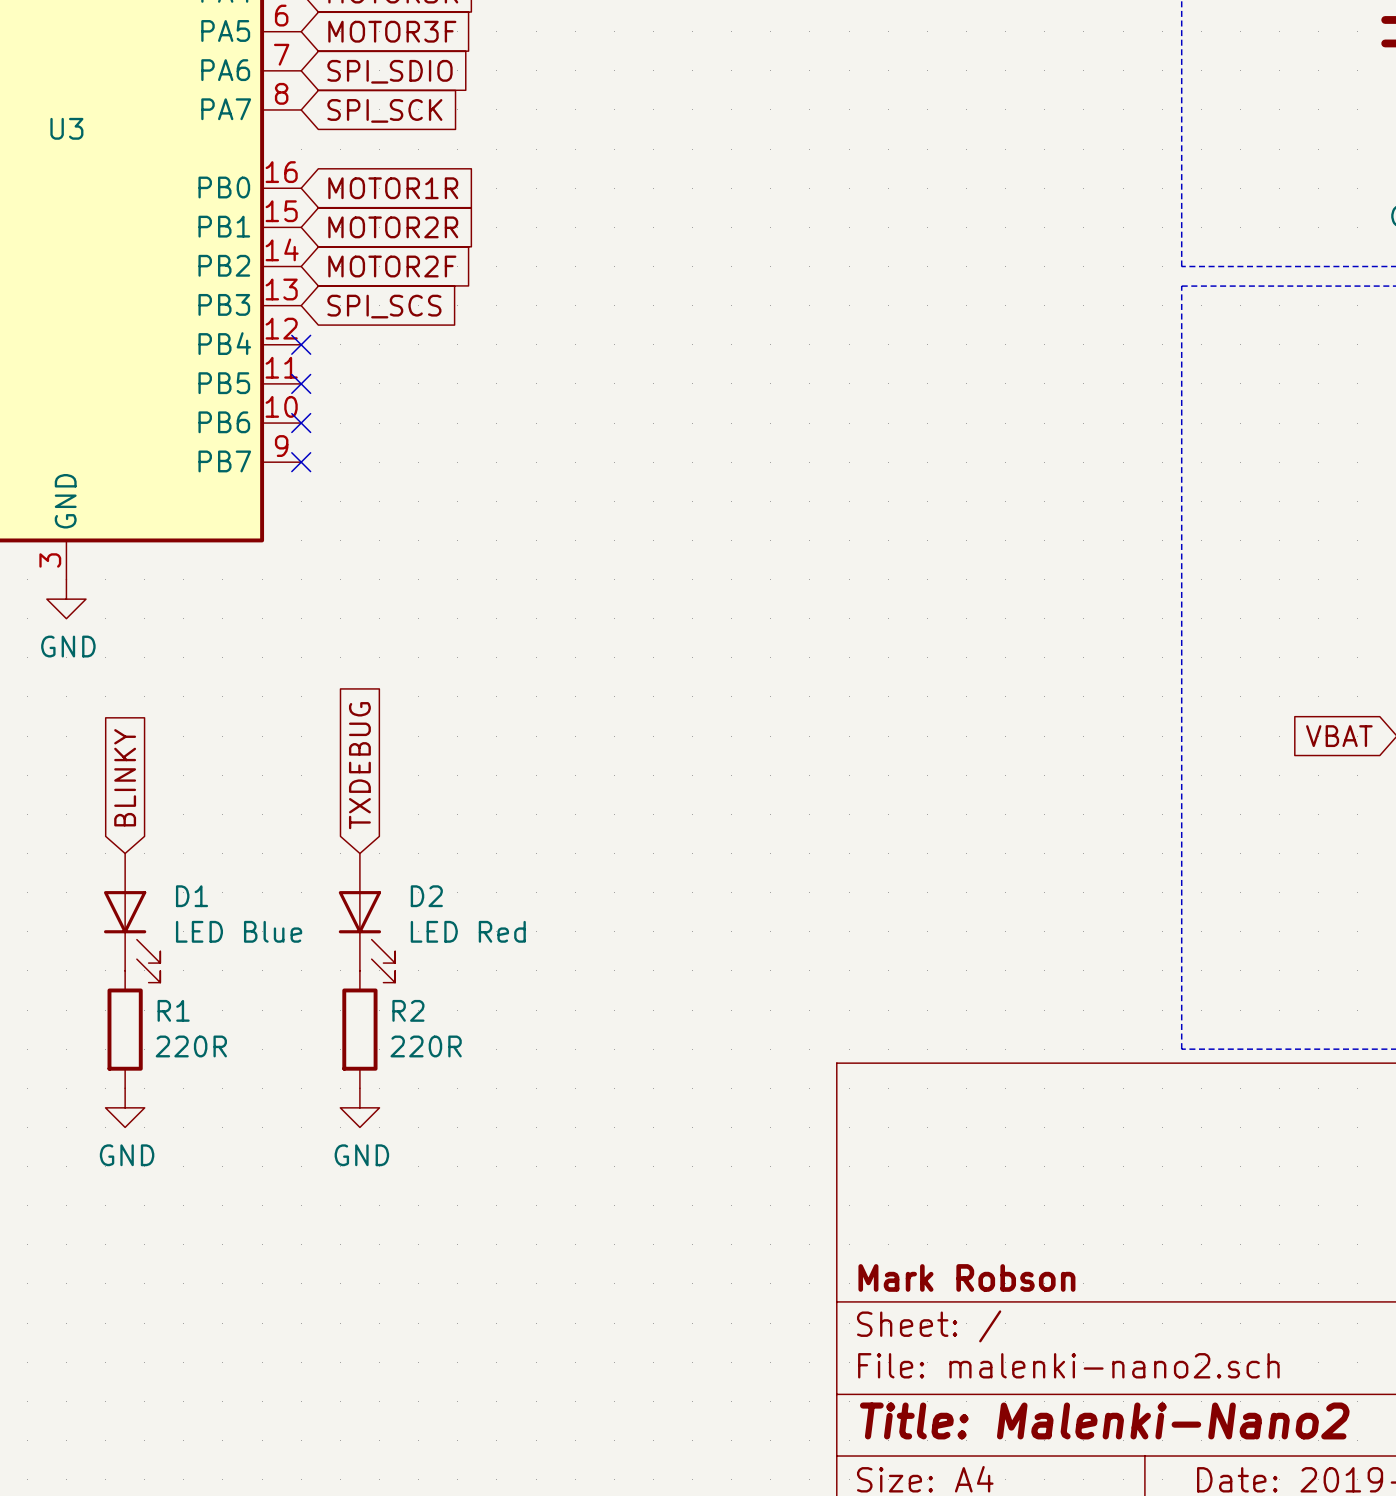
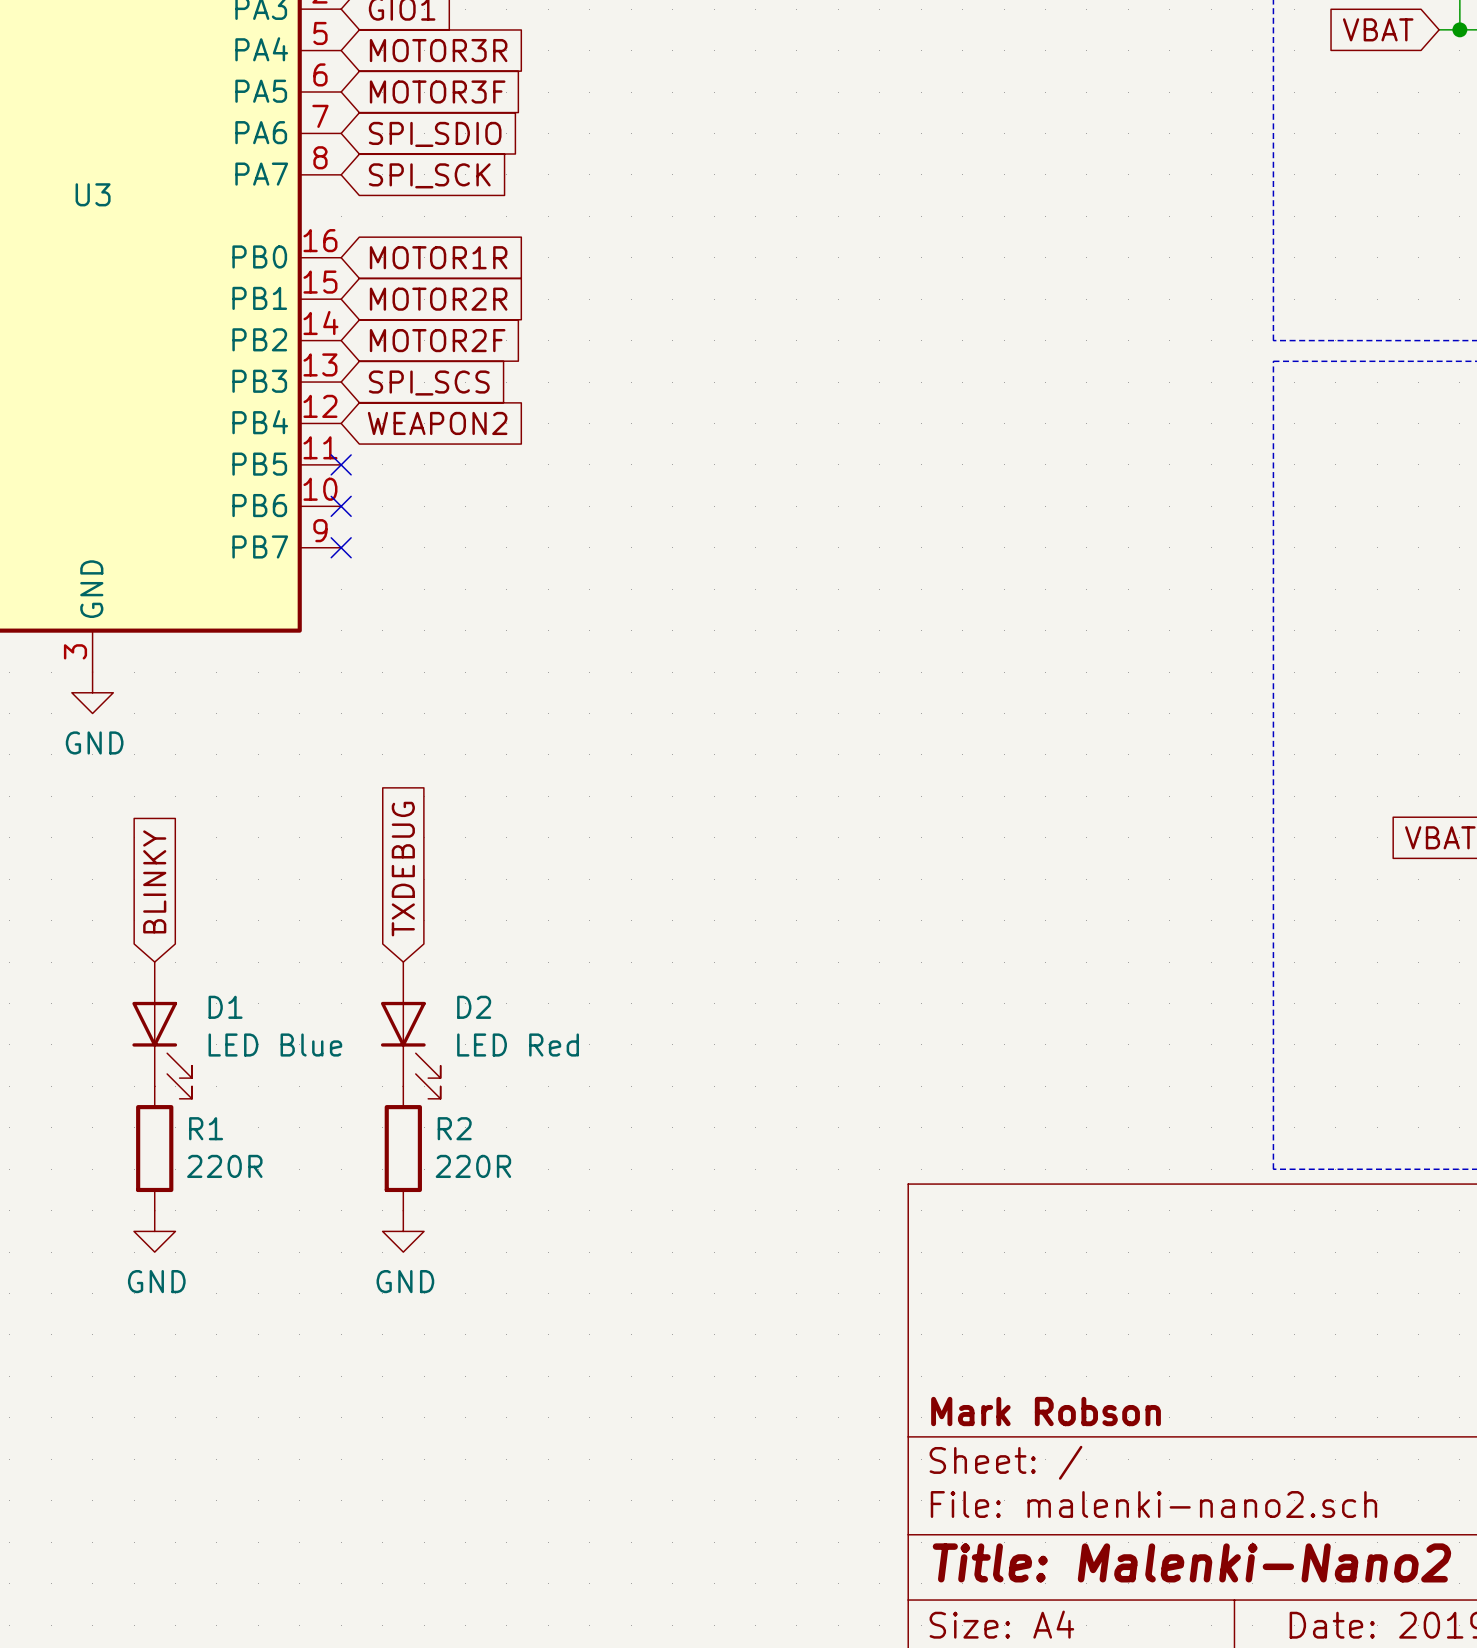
no-connect mark: (301, 344) -> none
global label: none -> WEAPON2 (437, 423)

